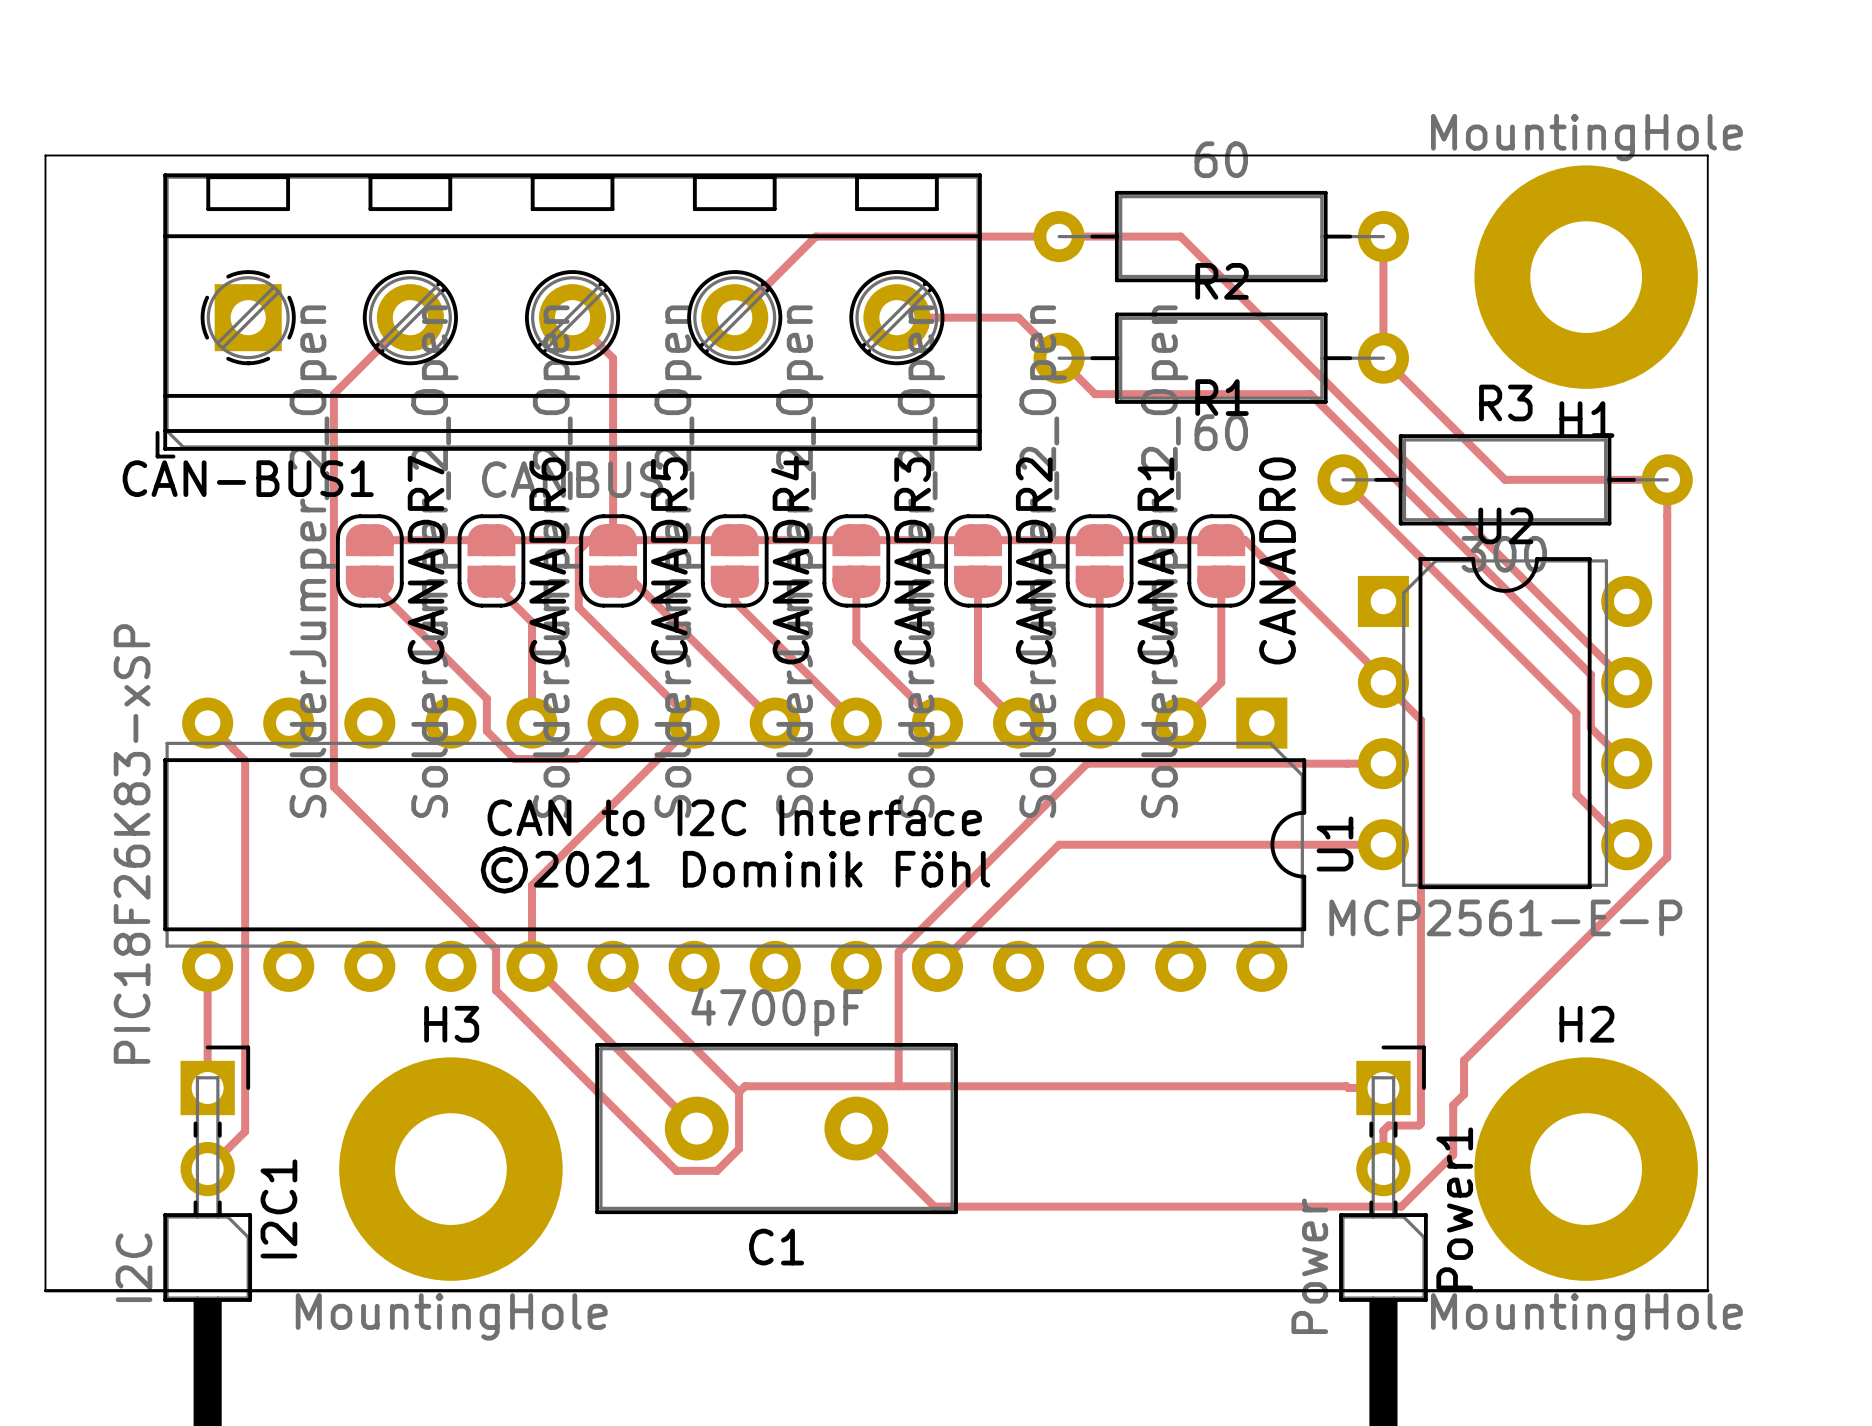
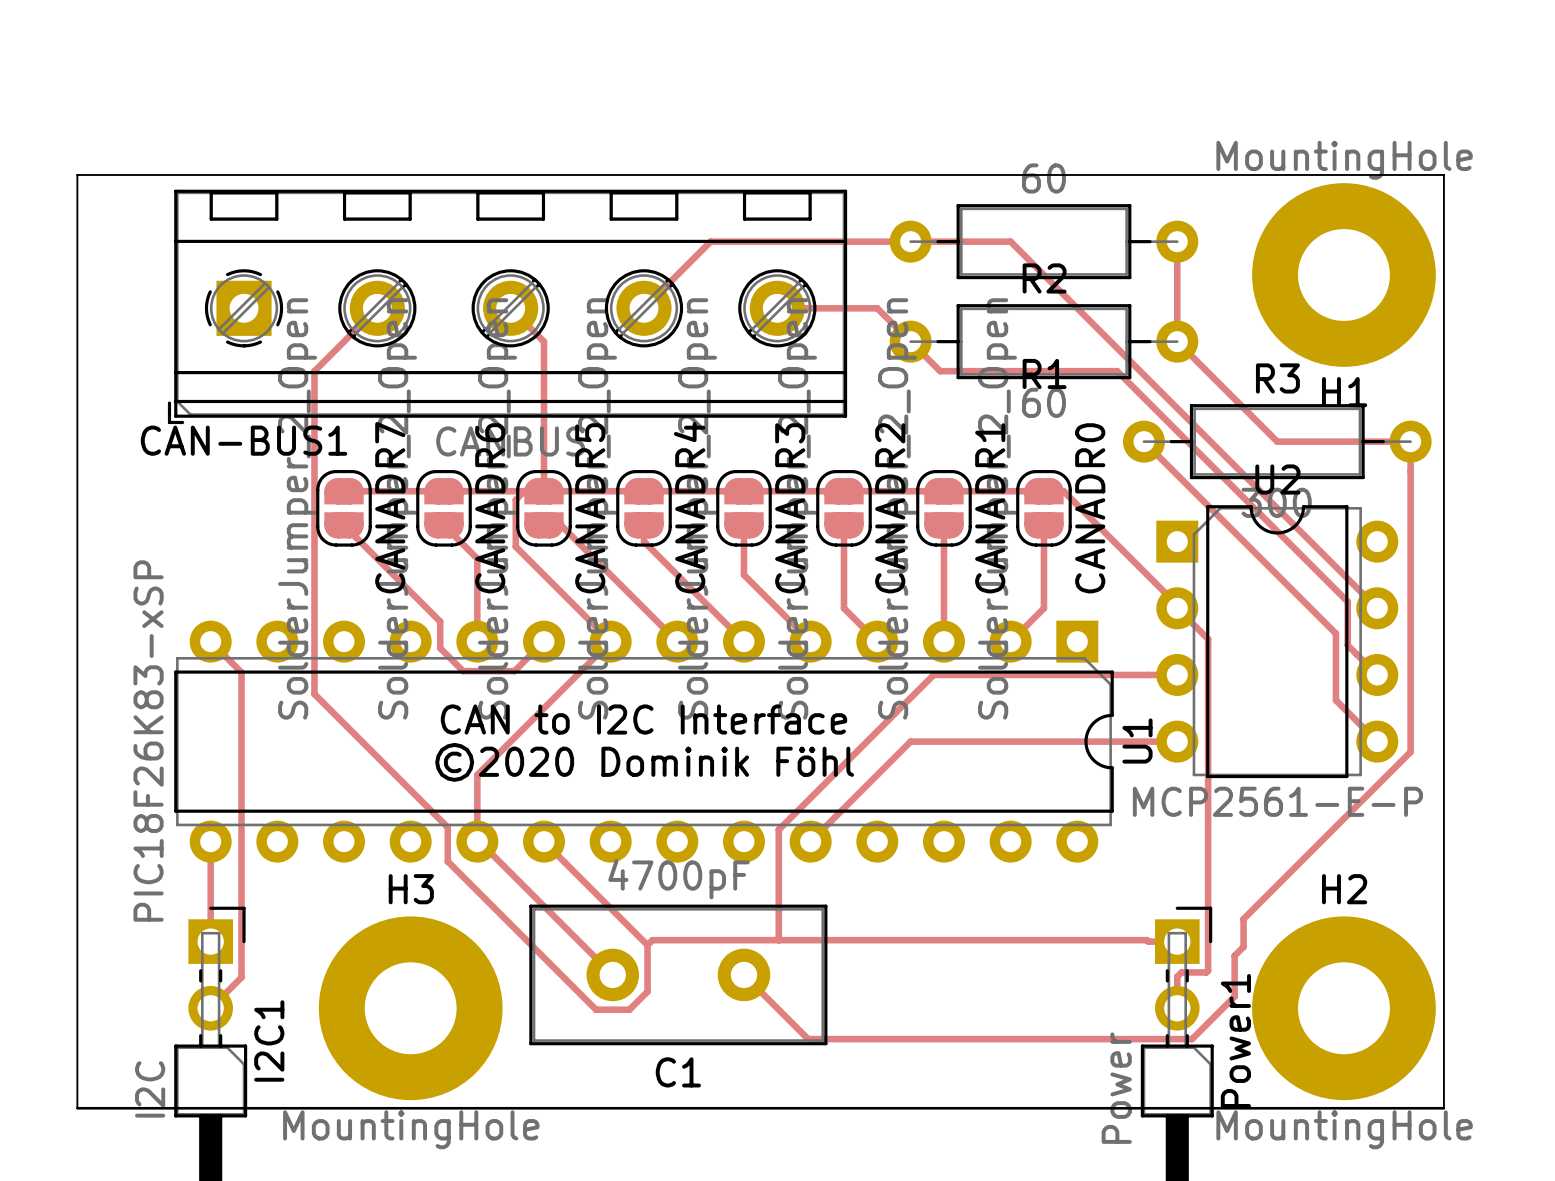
text: ©2021 Dominik Föhl (735, 870) -> ©2020 Dominik Föhl (644, 762)

